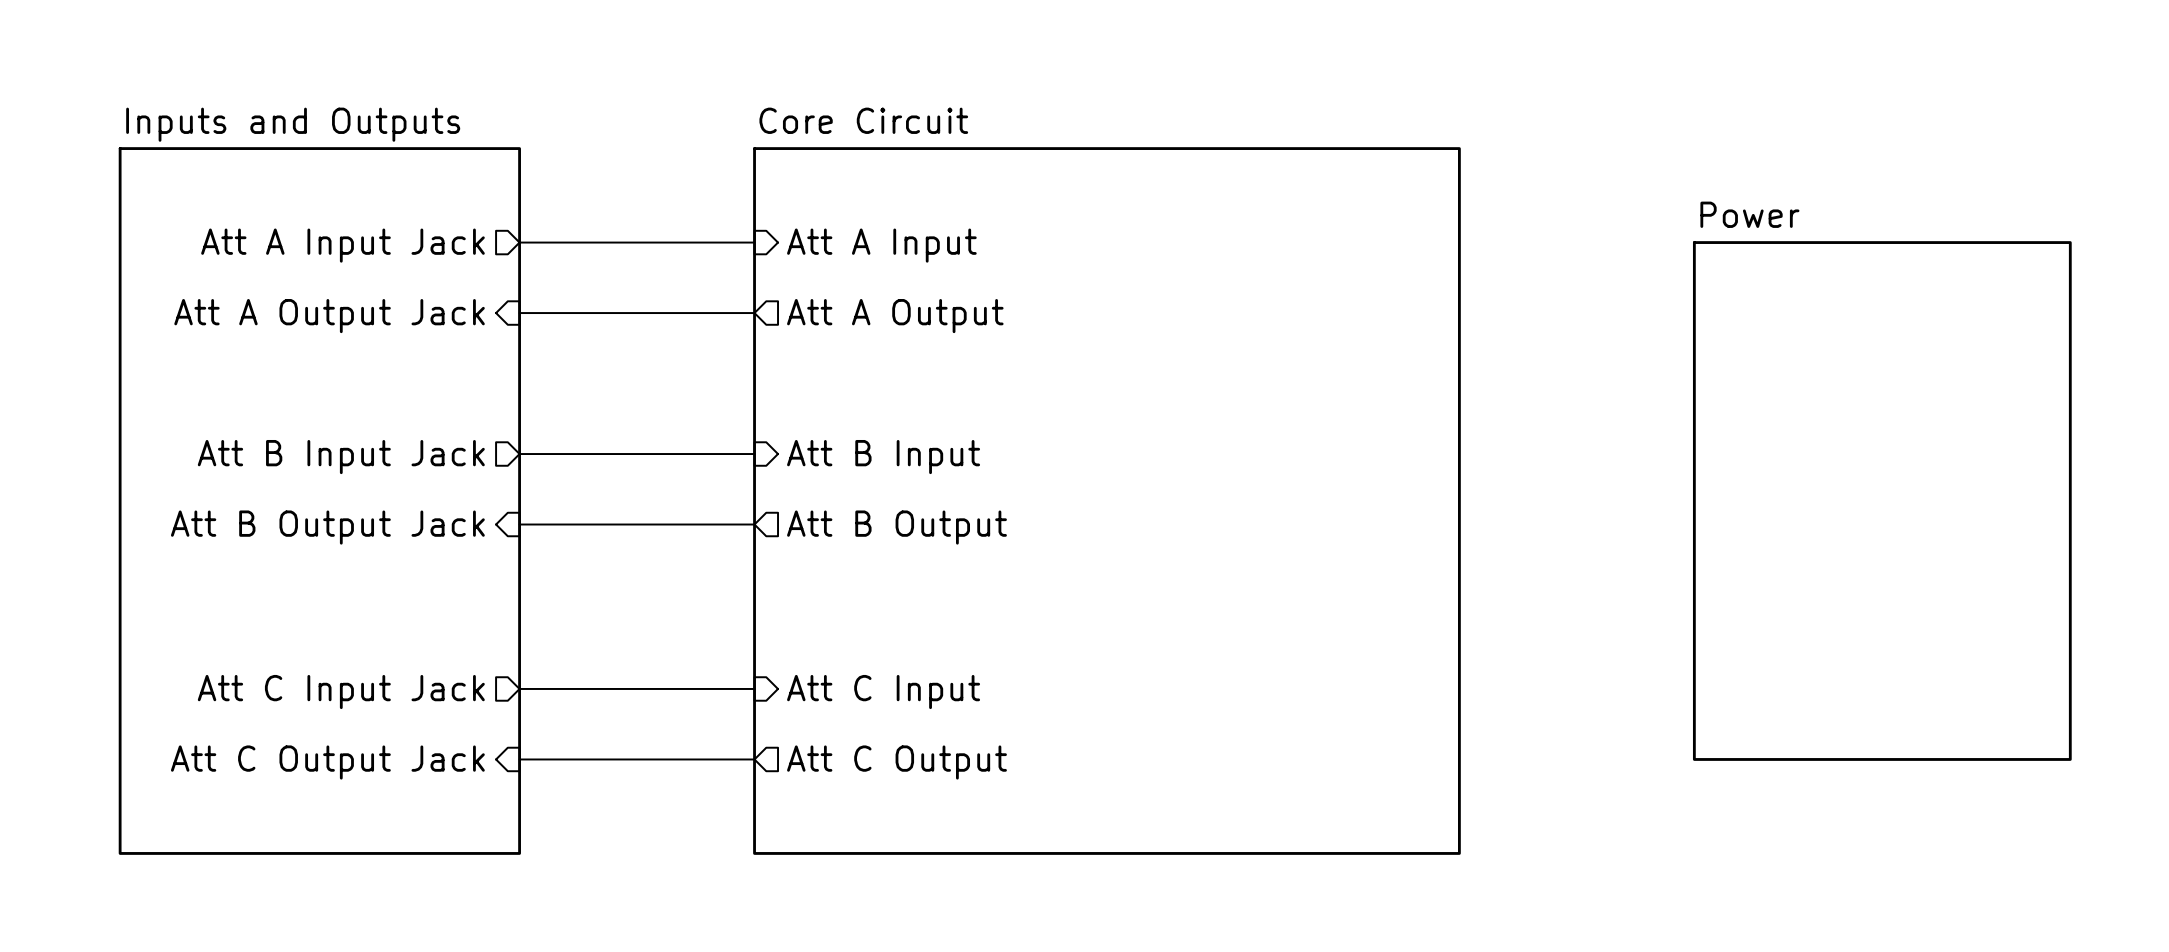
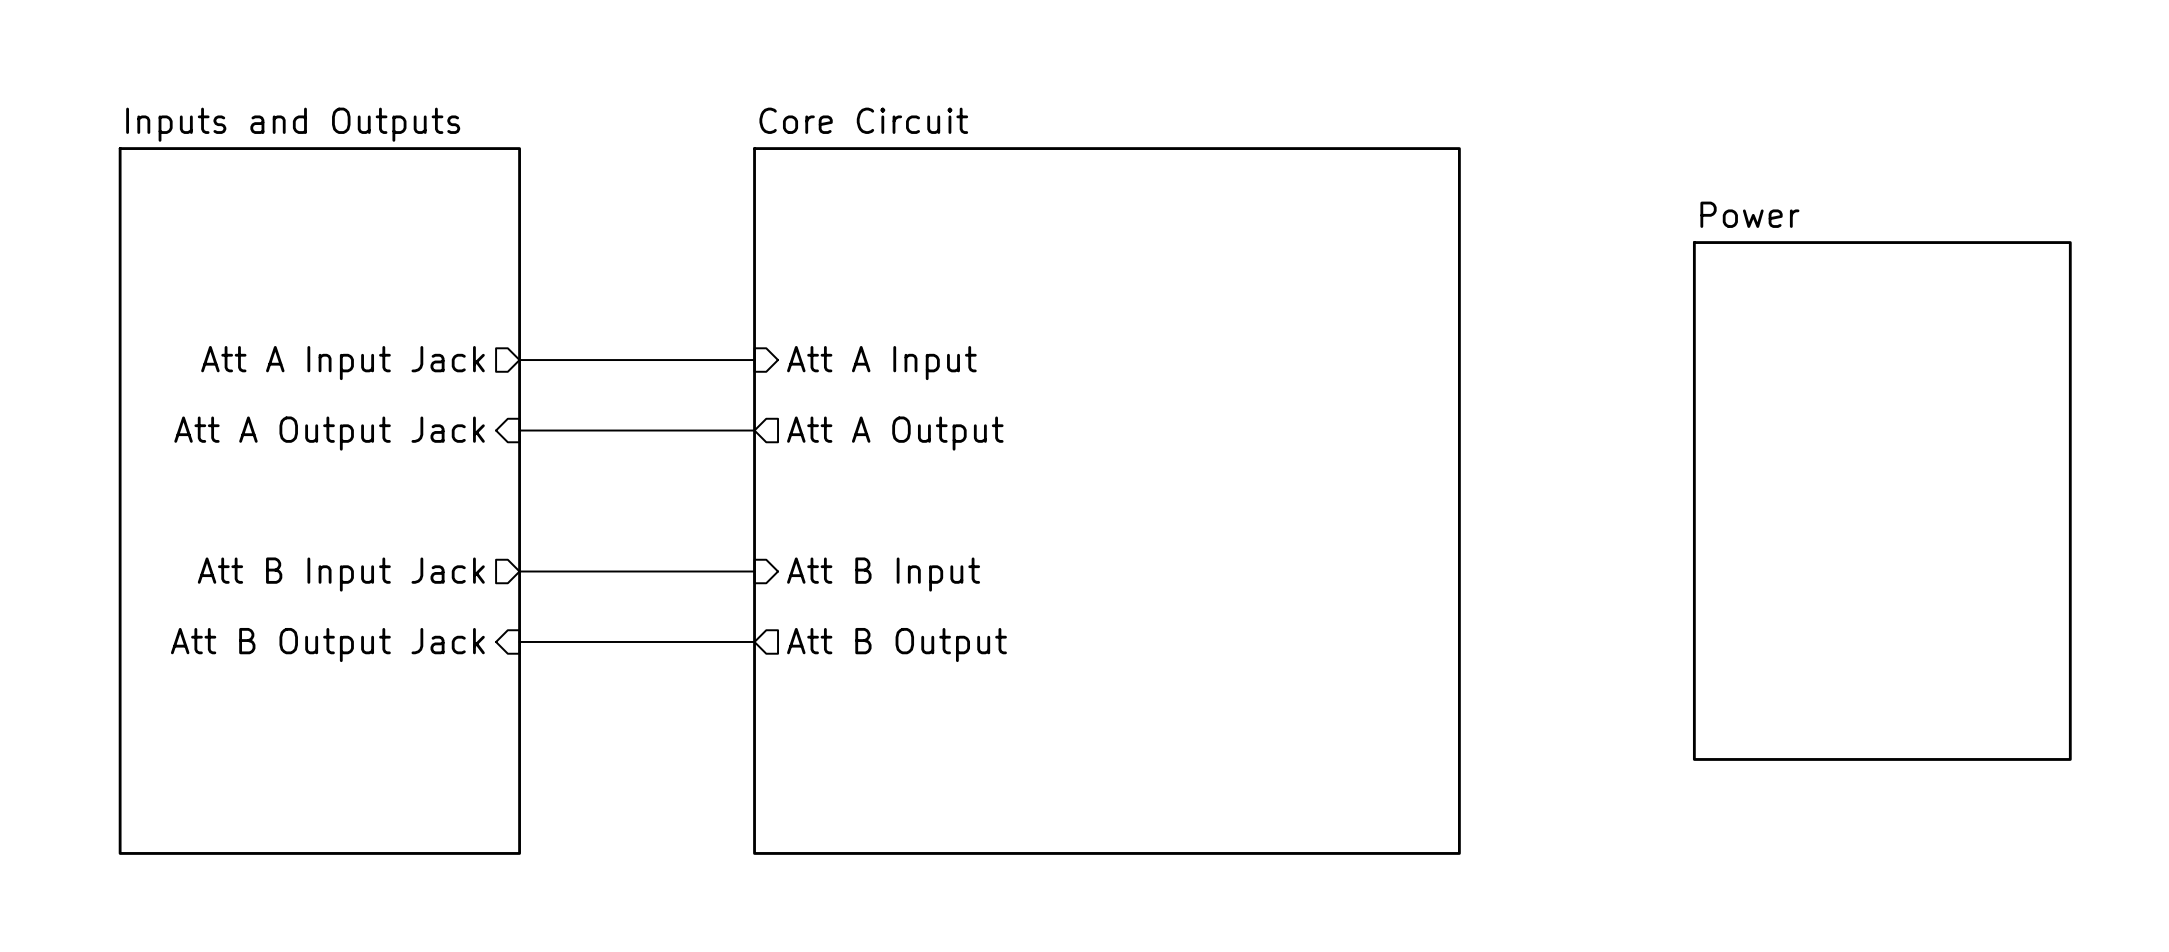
wire: (519, 242) (754, 242) -> (519, 360) (754, 360)
sheet pin position: Att A Input Jack (342, 245) -> Att A Input Jack (342, 363)
sheet pin position: Att A Input (881, 245) -> Att A Input (881, 363)
wire: (519, 313) (754, 313) -> (519, 430) (754, 430)
sheet pin position: Att A Output Jack (329, 316) -> Att A Output Jack (329, 433)
sheet pin position: Att A Output (895, 316) -> Att A Output (895, 433)
wire: (519, 454) (754, 454) -> (519, 571) (754, 571)
sheet pin position: Att B Input Jack (341, 457) -> Att B Input Jack (341, 574)
sheet pin position: Att B Input (883, 457) -> Att B Input (883, 574)
wire: (519, 524) (754, 524) -> (519, 641) (754, 641)
sheet pin position: Att B Output Jack (327, 527) -> Att B Output Jack (327, 645)
sheet pin position: Att B Output (896, 527) -> Att B Output (896, 645)
wire: (519, 688) (754, 688) -> none
sheet pin: Att C Input Jack (341, 692) -> none
sheet pin: Att C Input (883, 692) -> none
wire: (519, 759) (754, 759) -> none
sheet pin: Att C Output Jack (327, 762) -> none
sheet pin: Att C Output (896, 762) -> none

